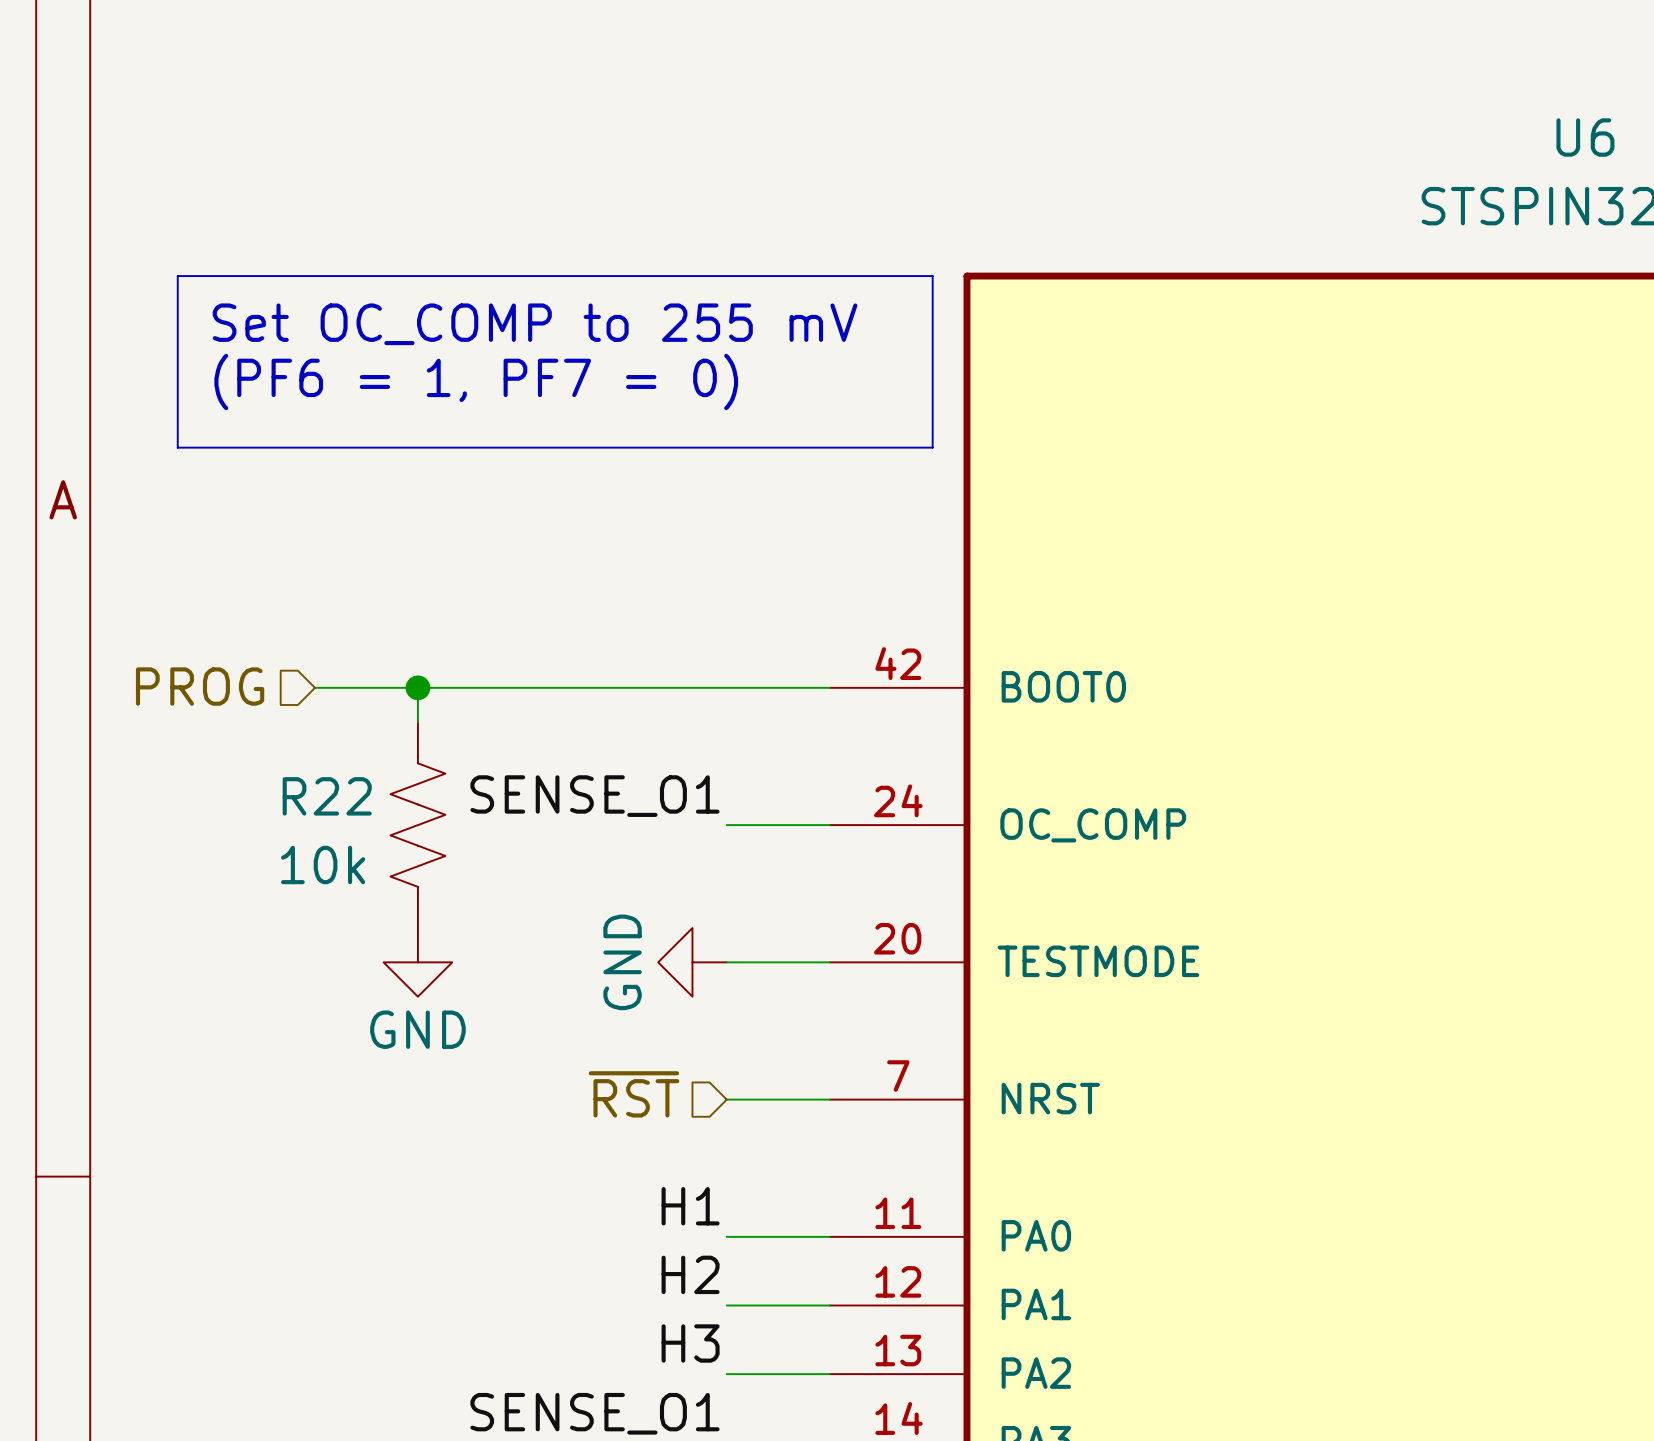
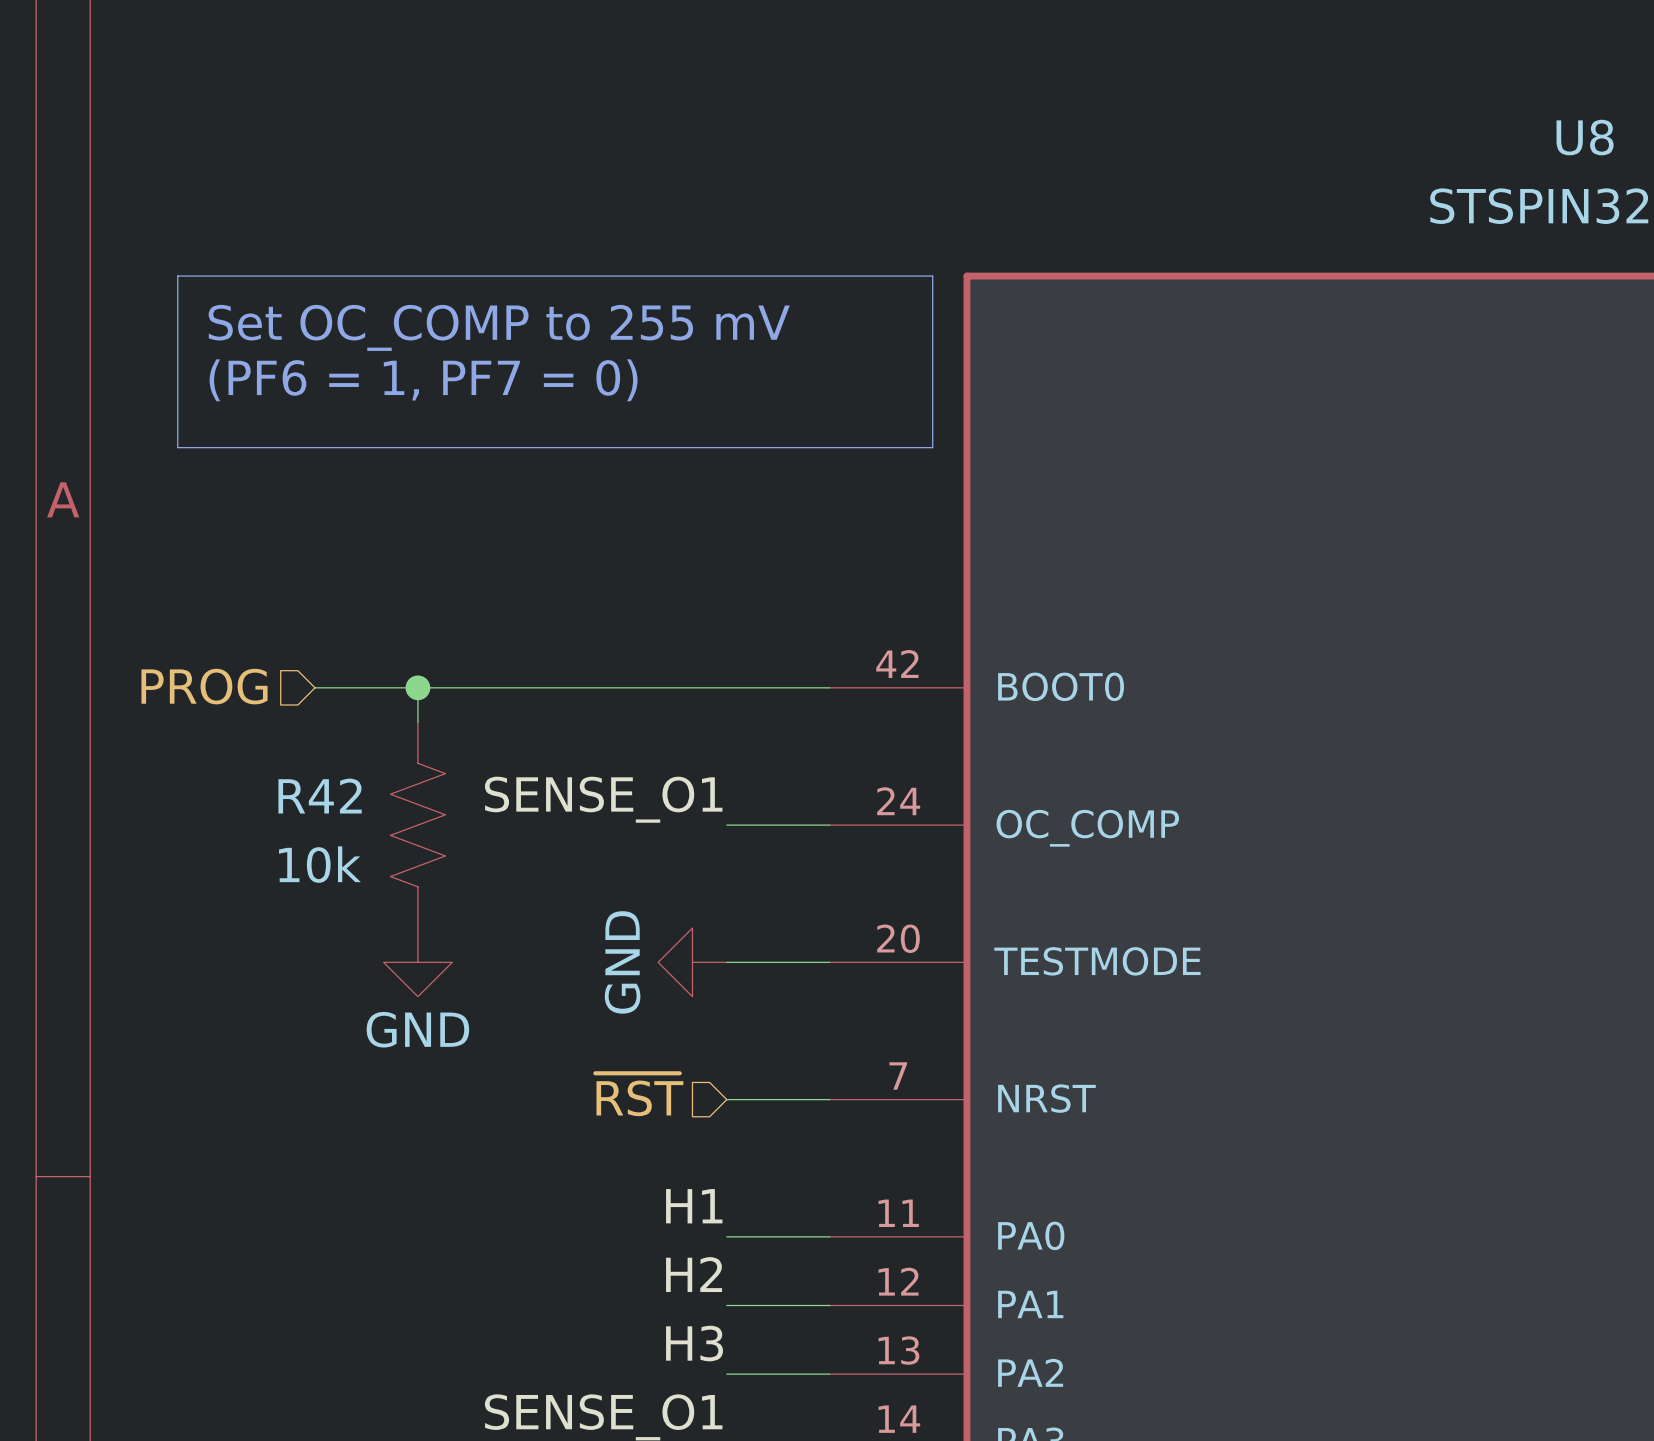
U6 name: U6 (1585, 137) -> U8 (1585, 137)
R22 name: R22 (327, 796) -> R42 (320, 796)

